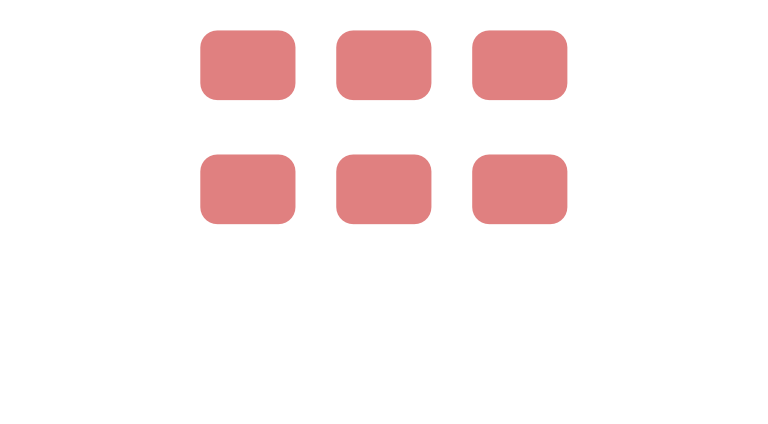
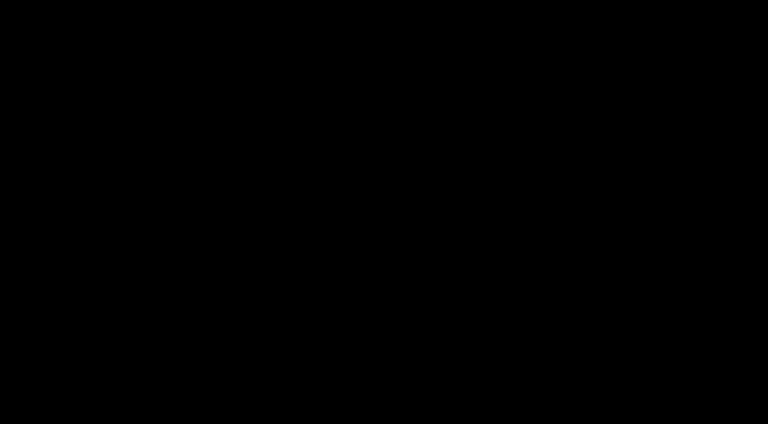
part: (247, 127) -> none
part: (383, 127) -> none
part: (519, 127) -> none

